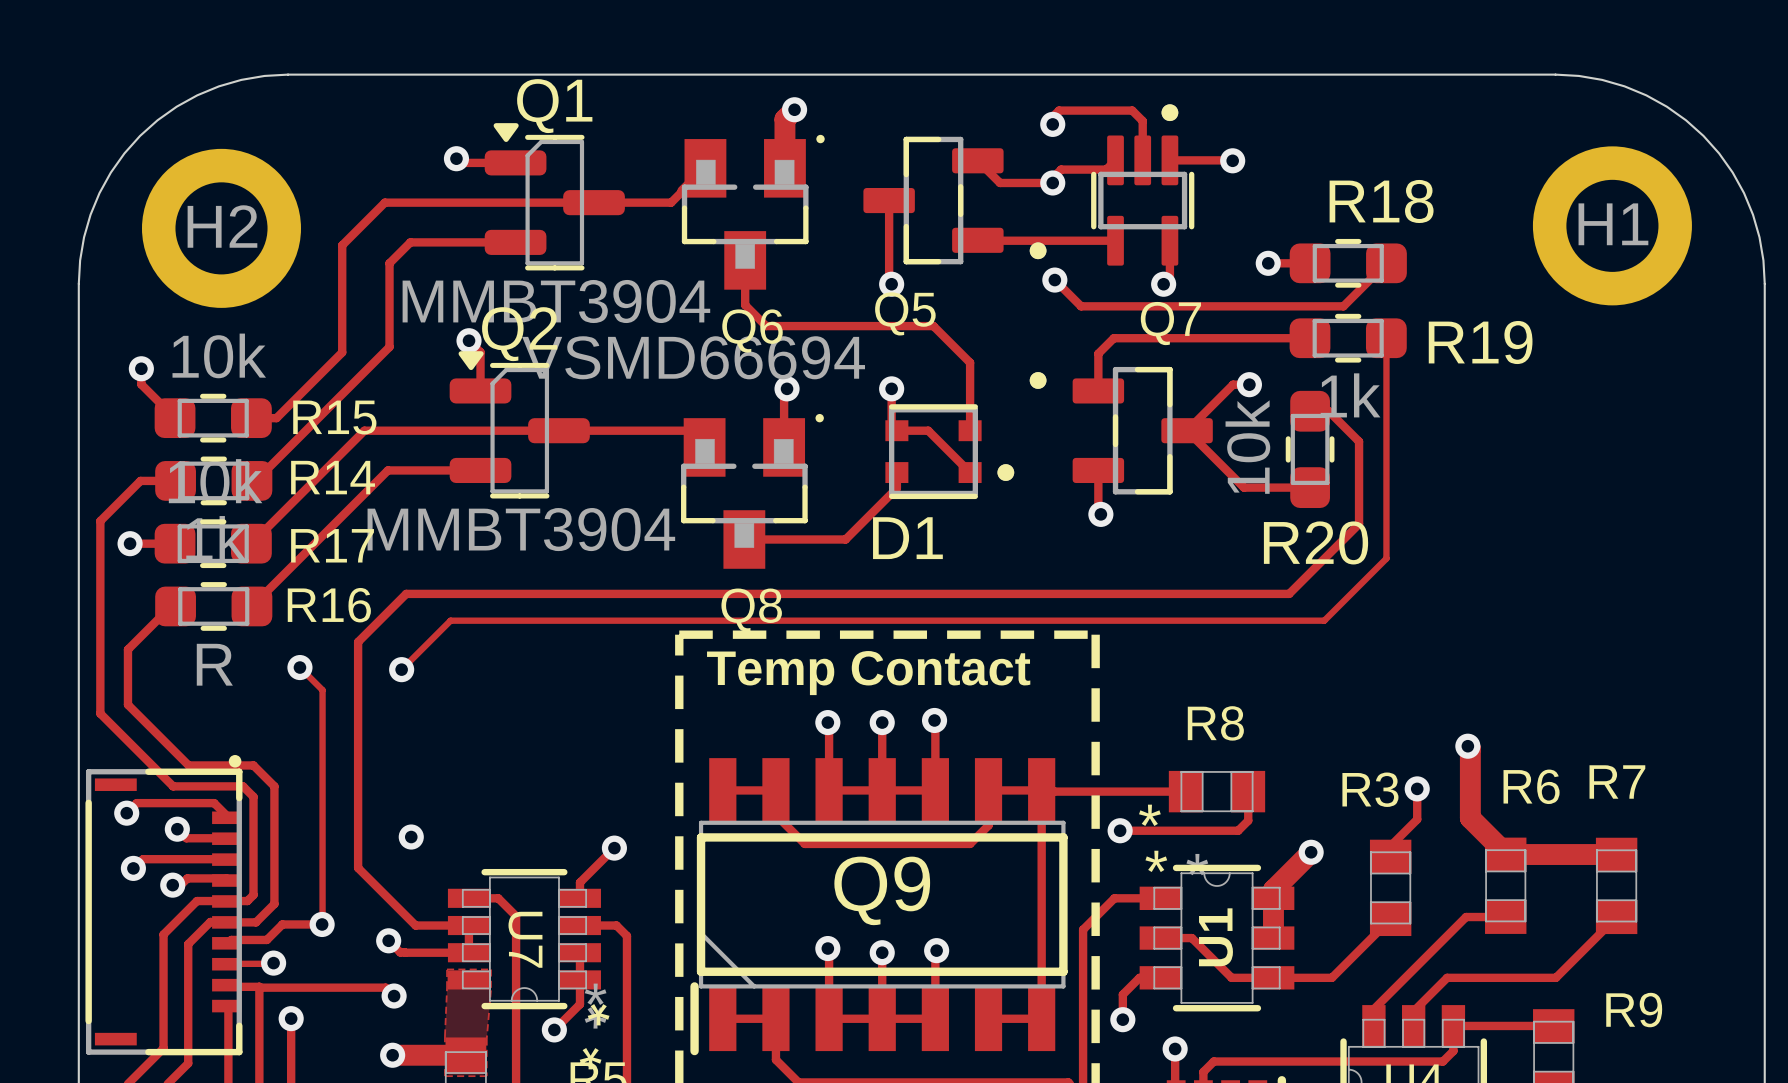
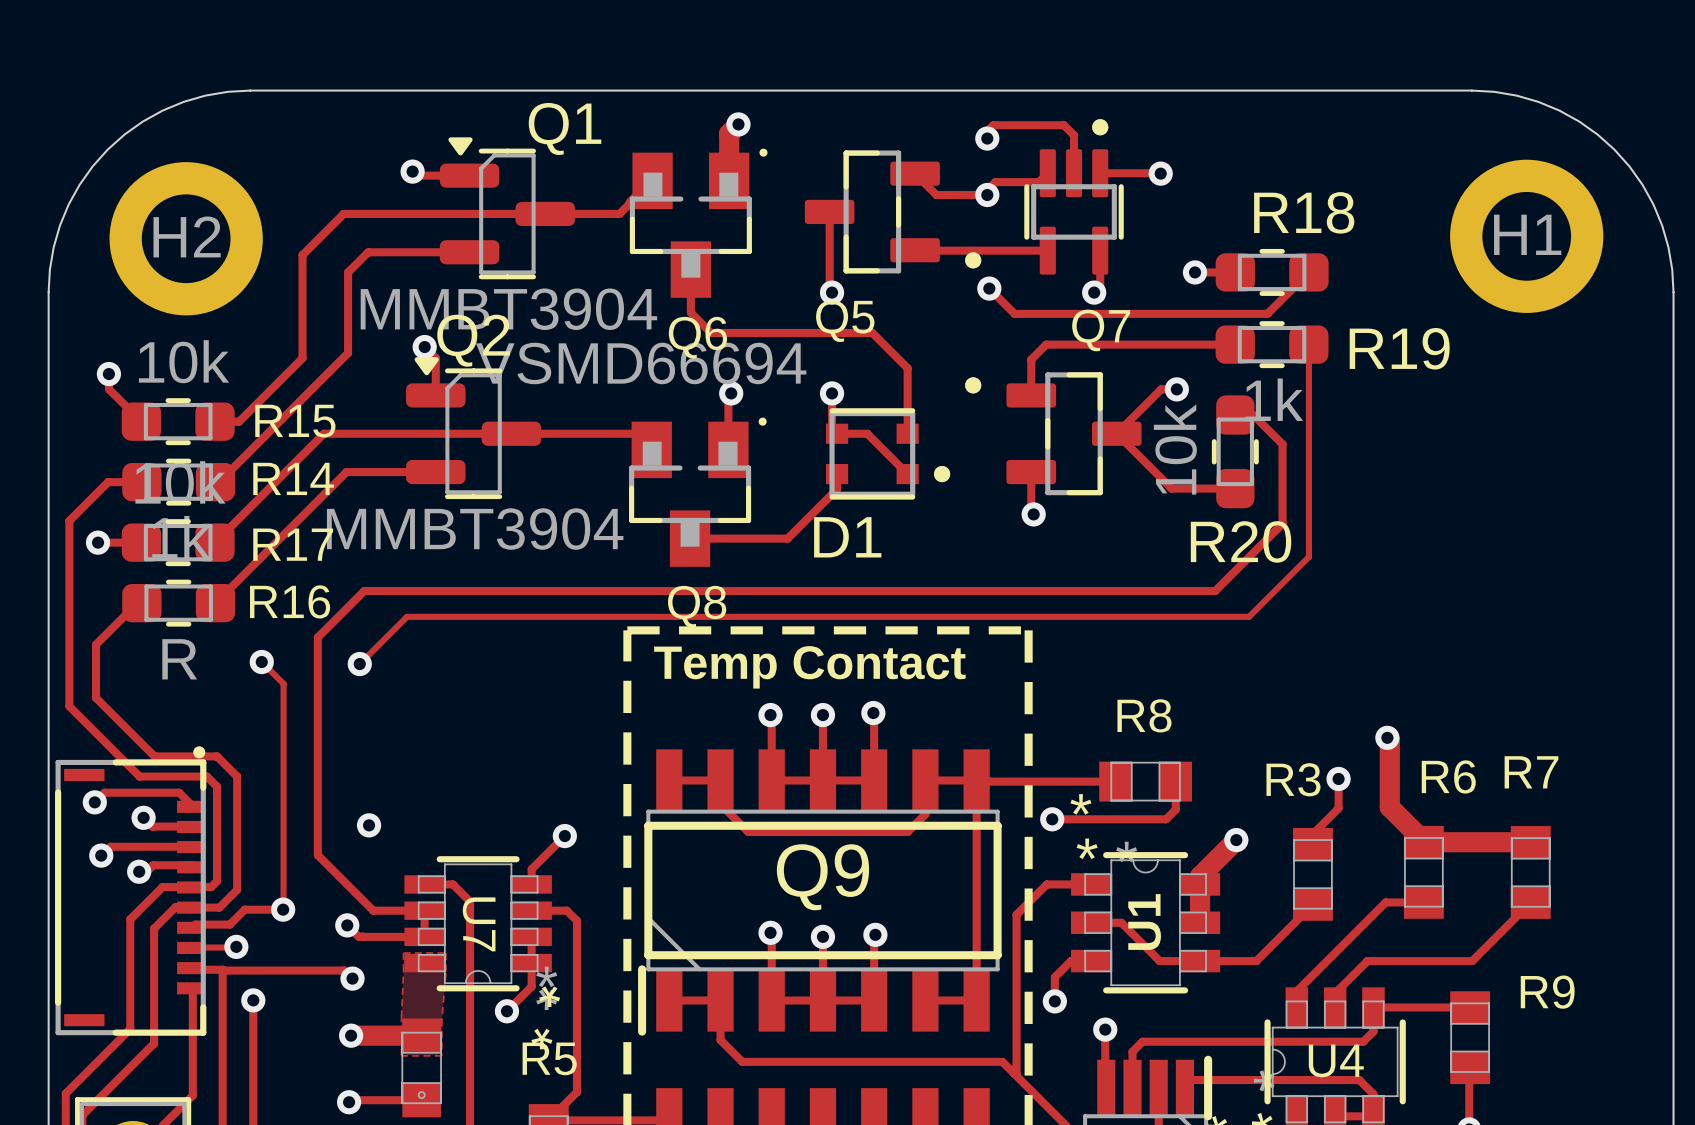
Q1 name position: Q1 (554, 106) -> Q1 (565, 128)

